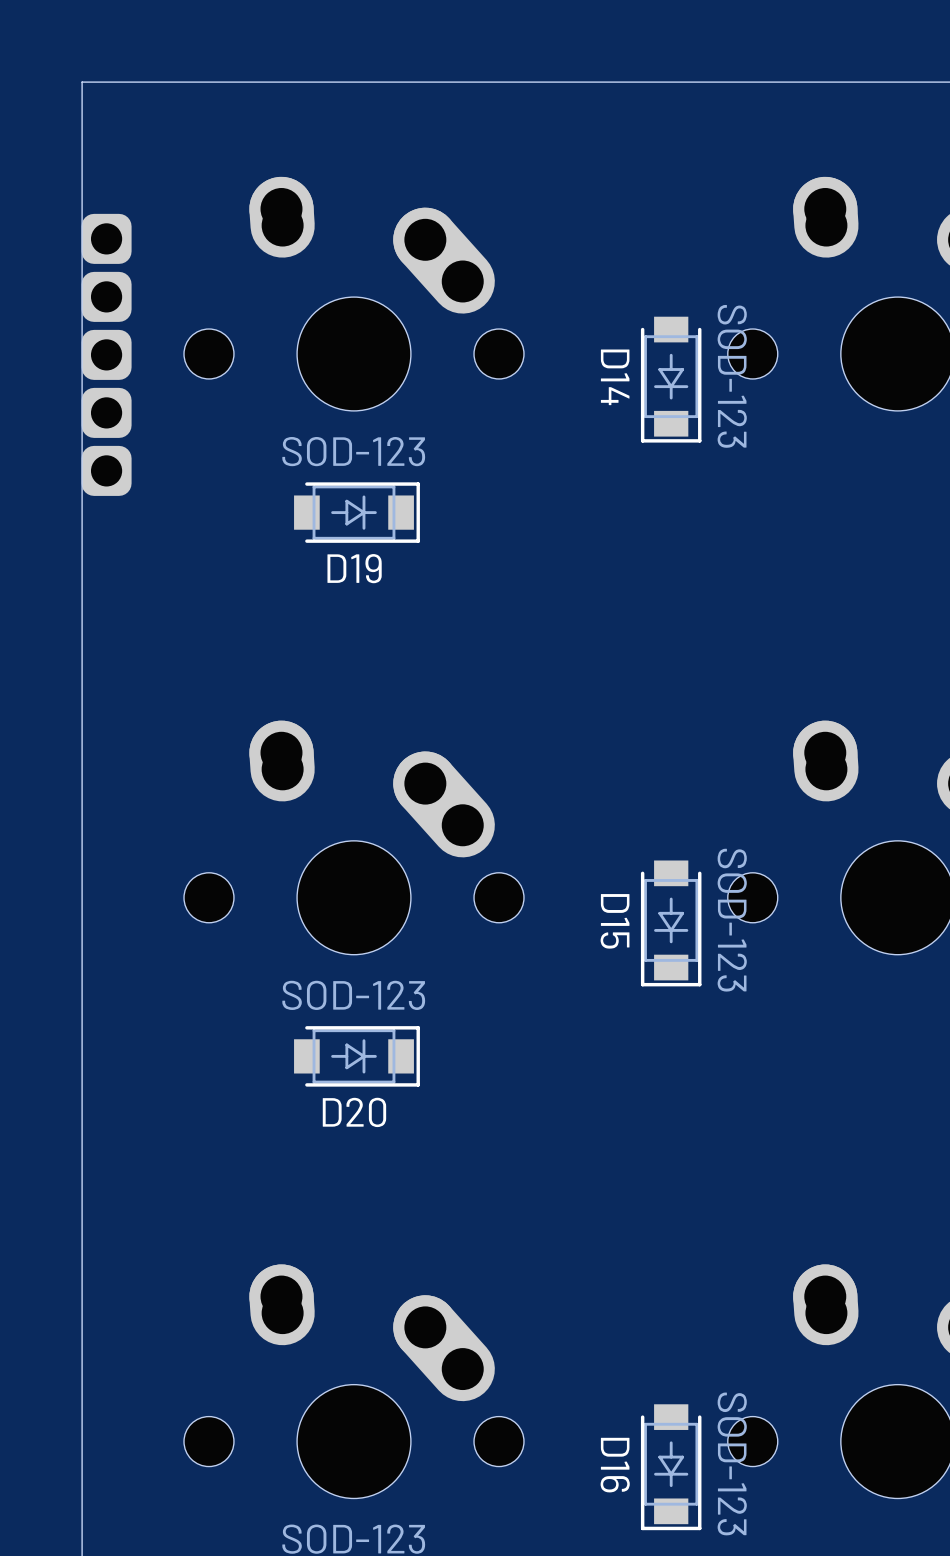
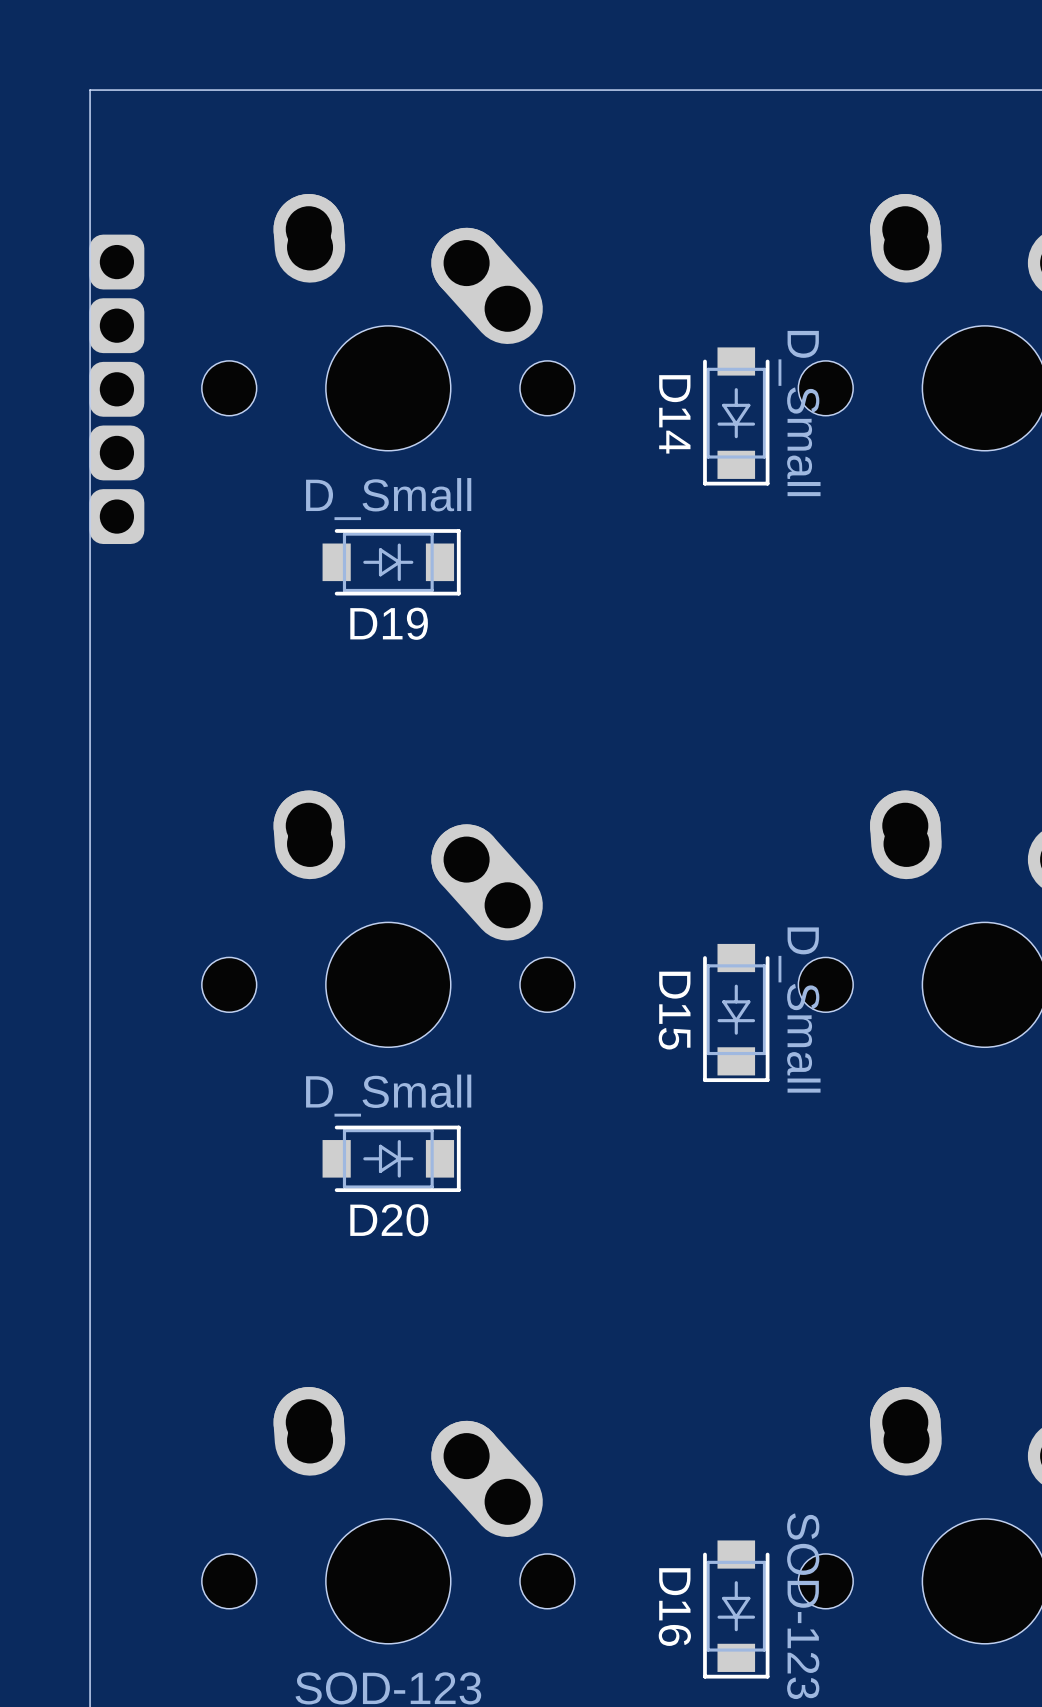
D14 value: SOD-123 (732, 376) -> D_Small (799, 413)
D19 value: SOD-123 (353, 451) -> D_Small (388, 499)
D15 value: SOD-123 (732, 920) -> D_Small (799, 1010)
D20 value: SOD-123 (353, 995) -> D_Small (388, 1095)

